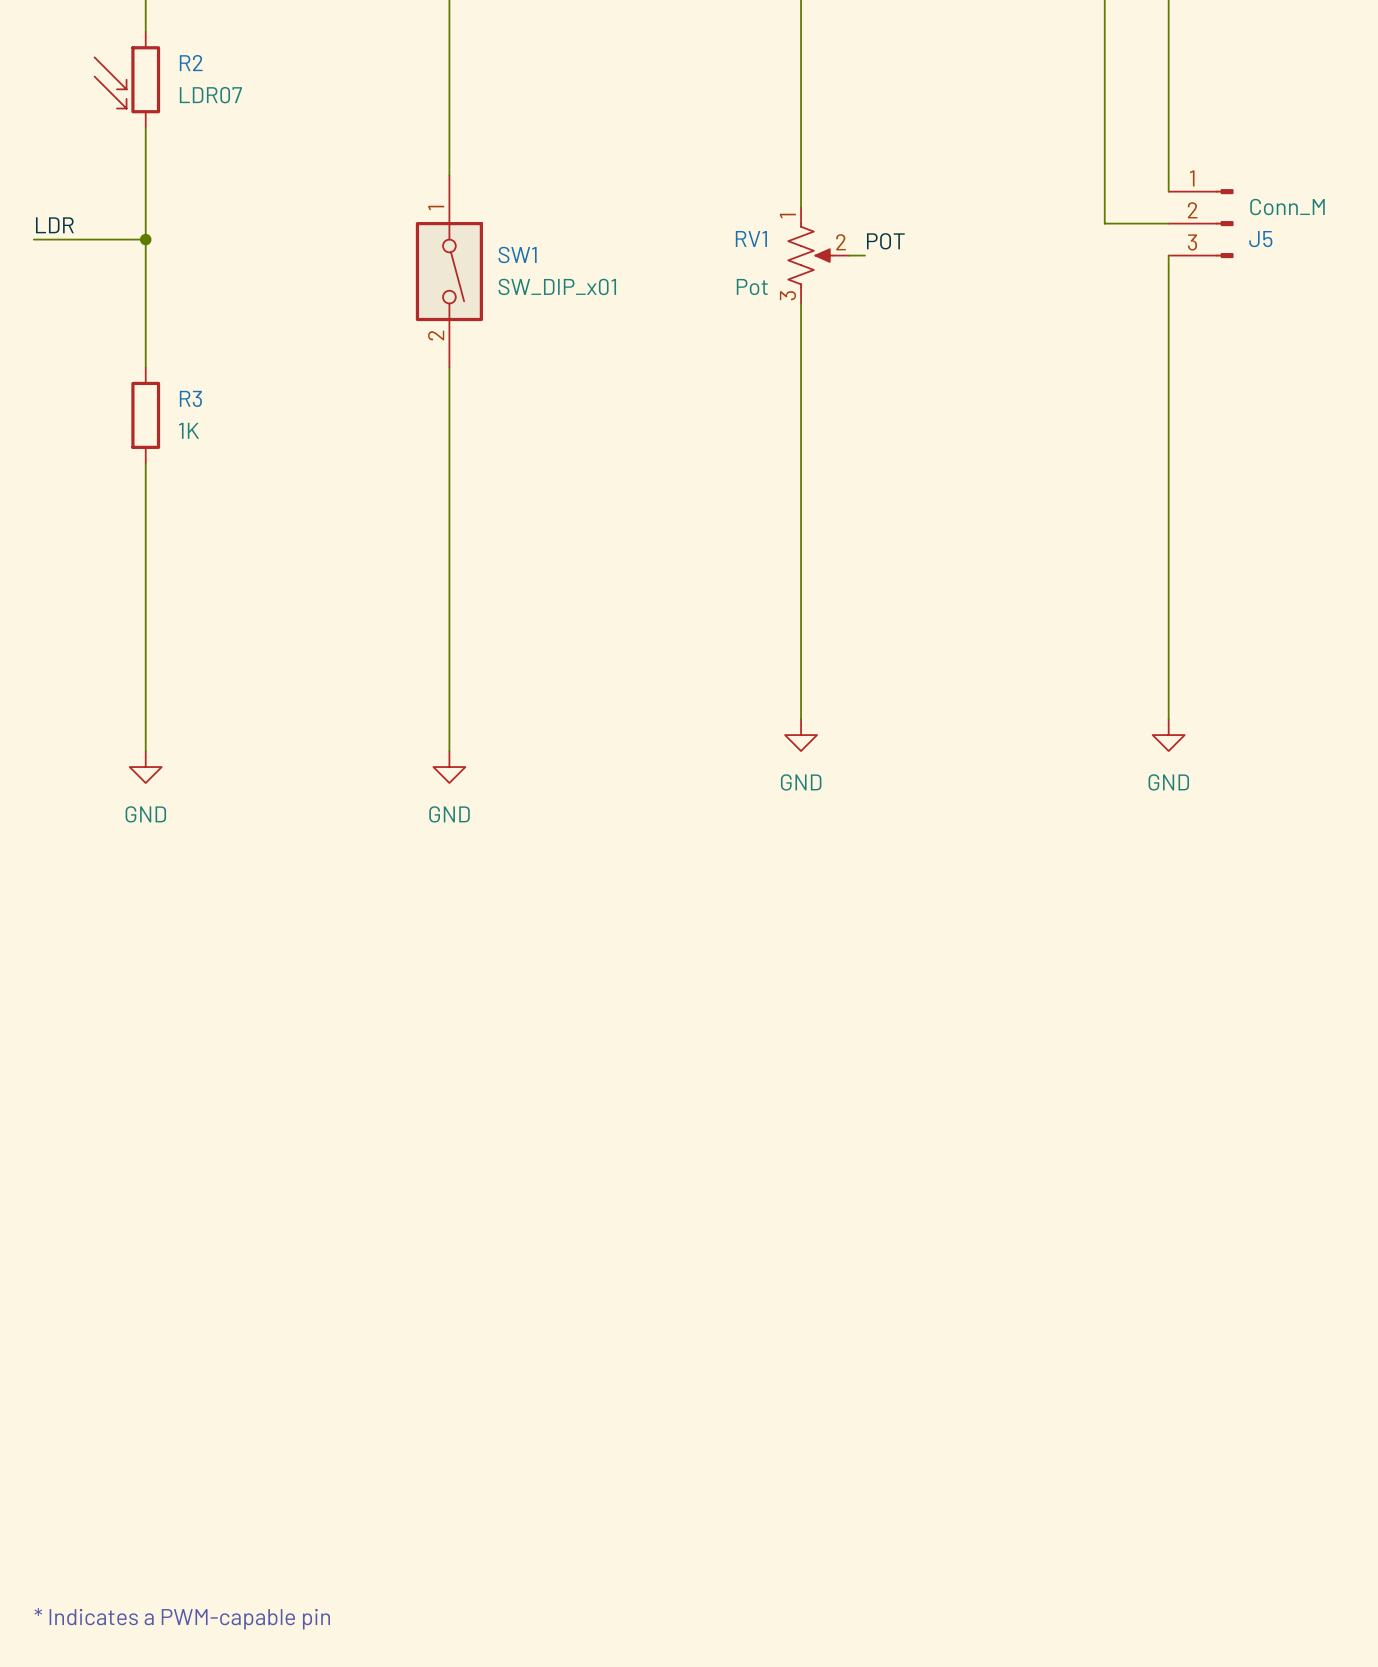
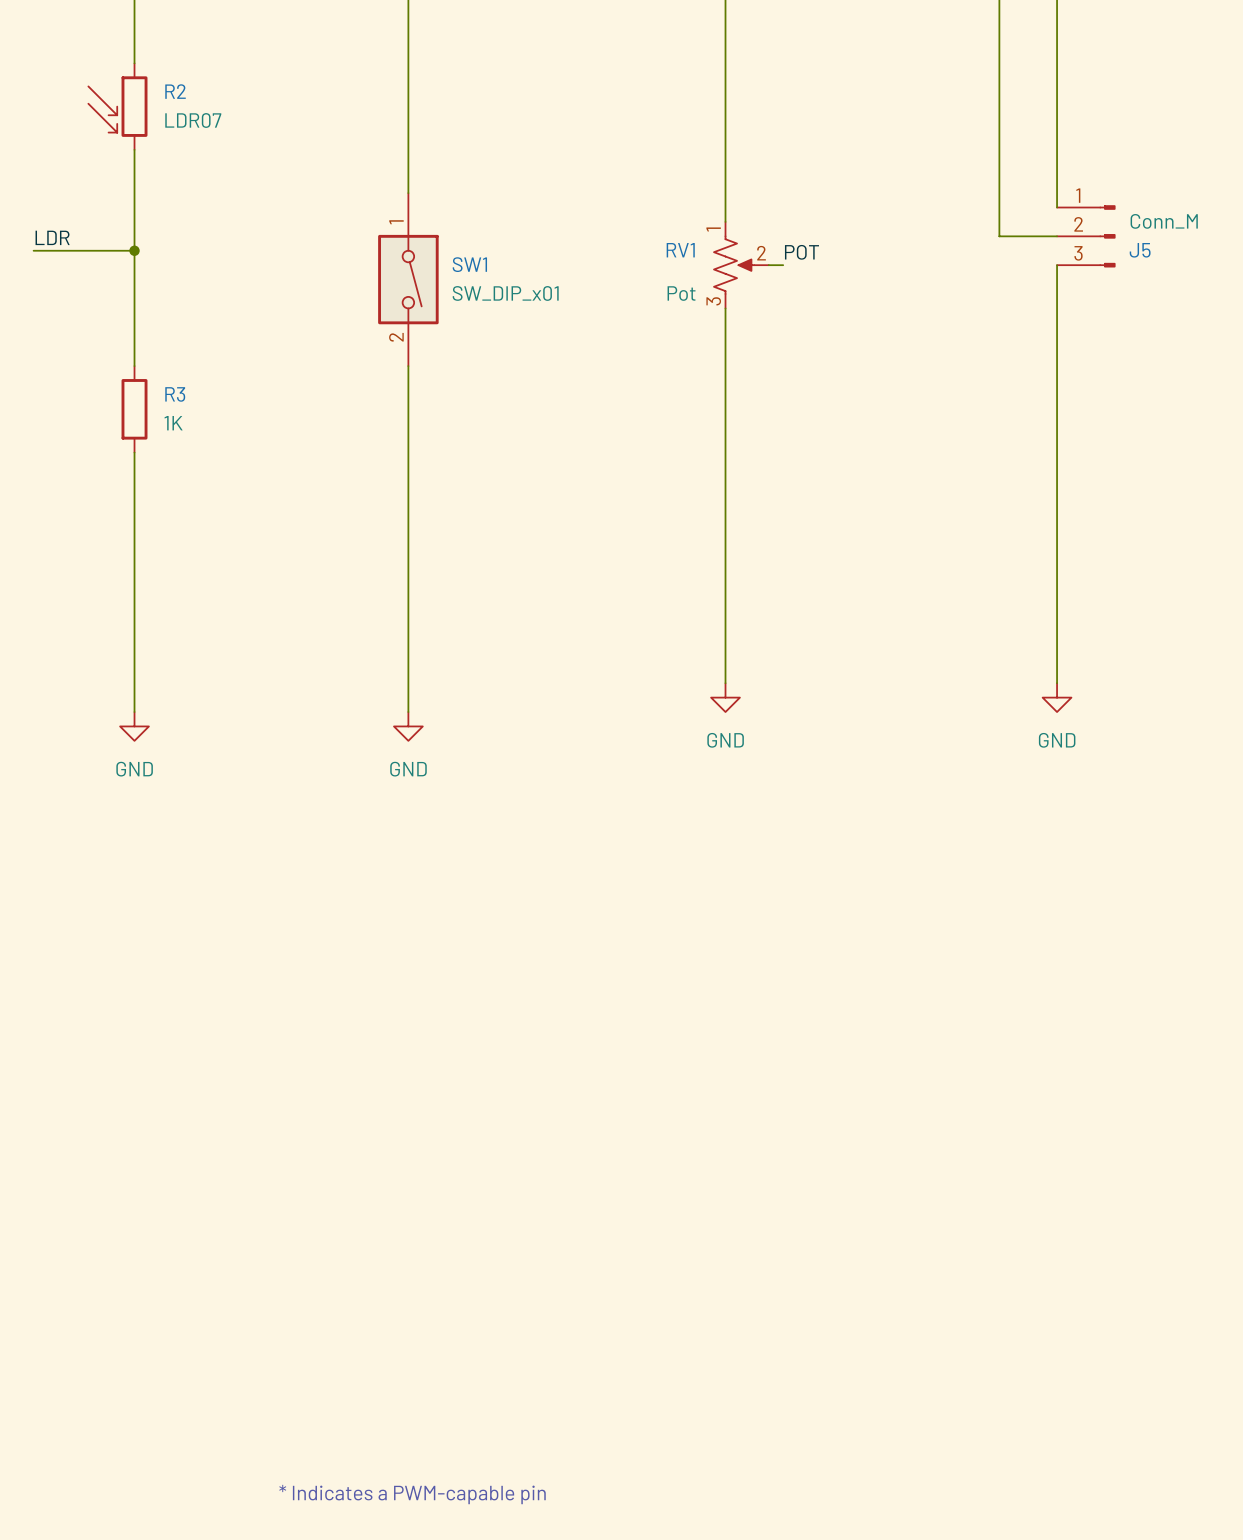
text position: * Indicates a PWM-capable pin (182, 1618) -> * Indicates a PWM-capable pin (412, 1494)

